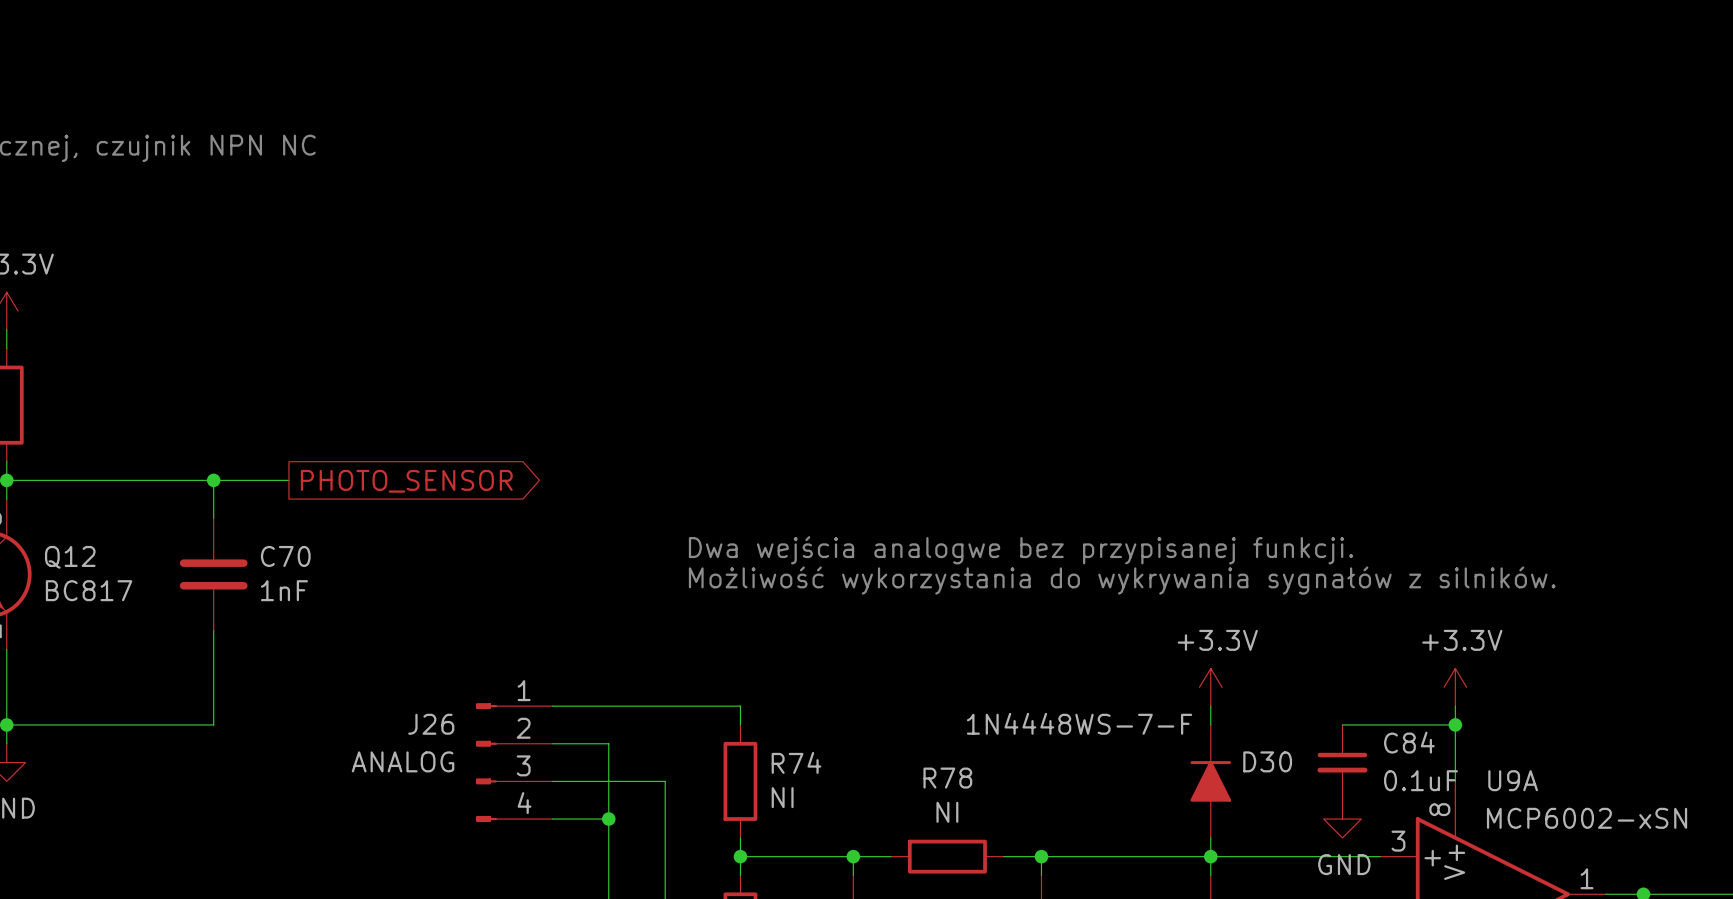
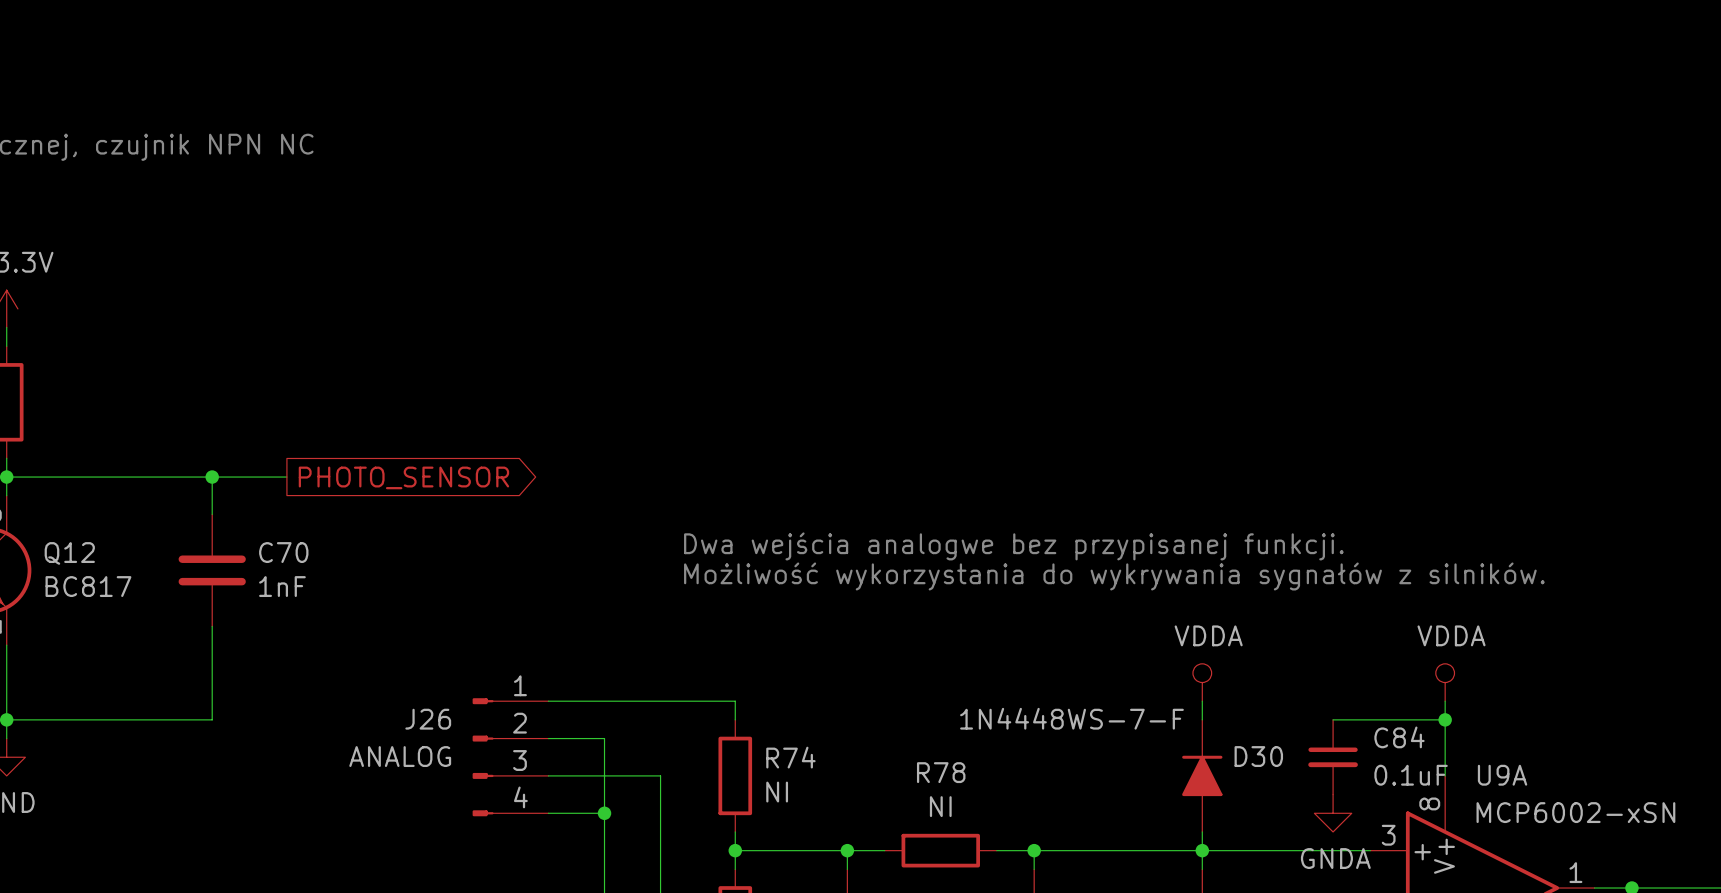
power symbol: +3.3V (1210, 687) -> VDDA (1202, 682)
power symbol: +3.3V (1455, 687) -> VDDA (1445, 682)
power symbol: GND (1342, 819) -> GNDA (1333, 813)

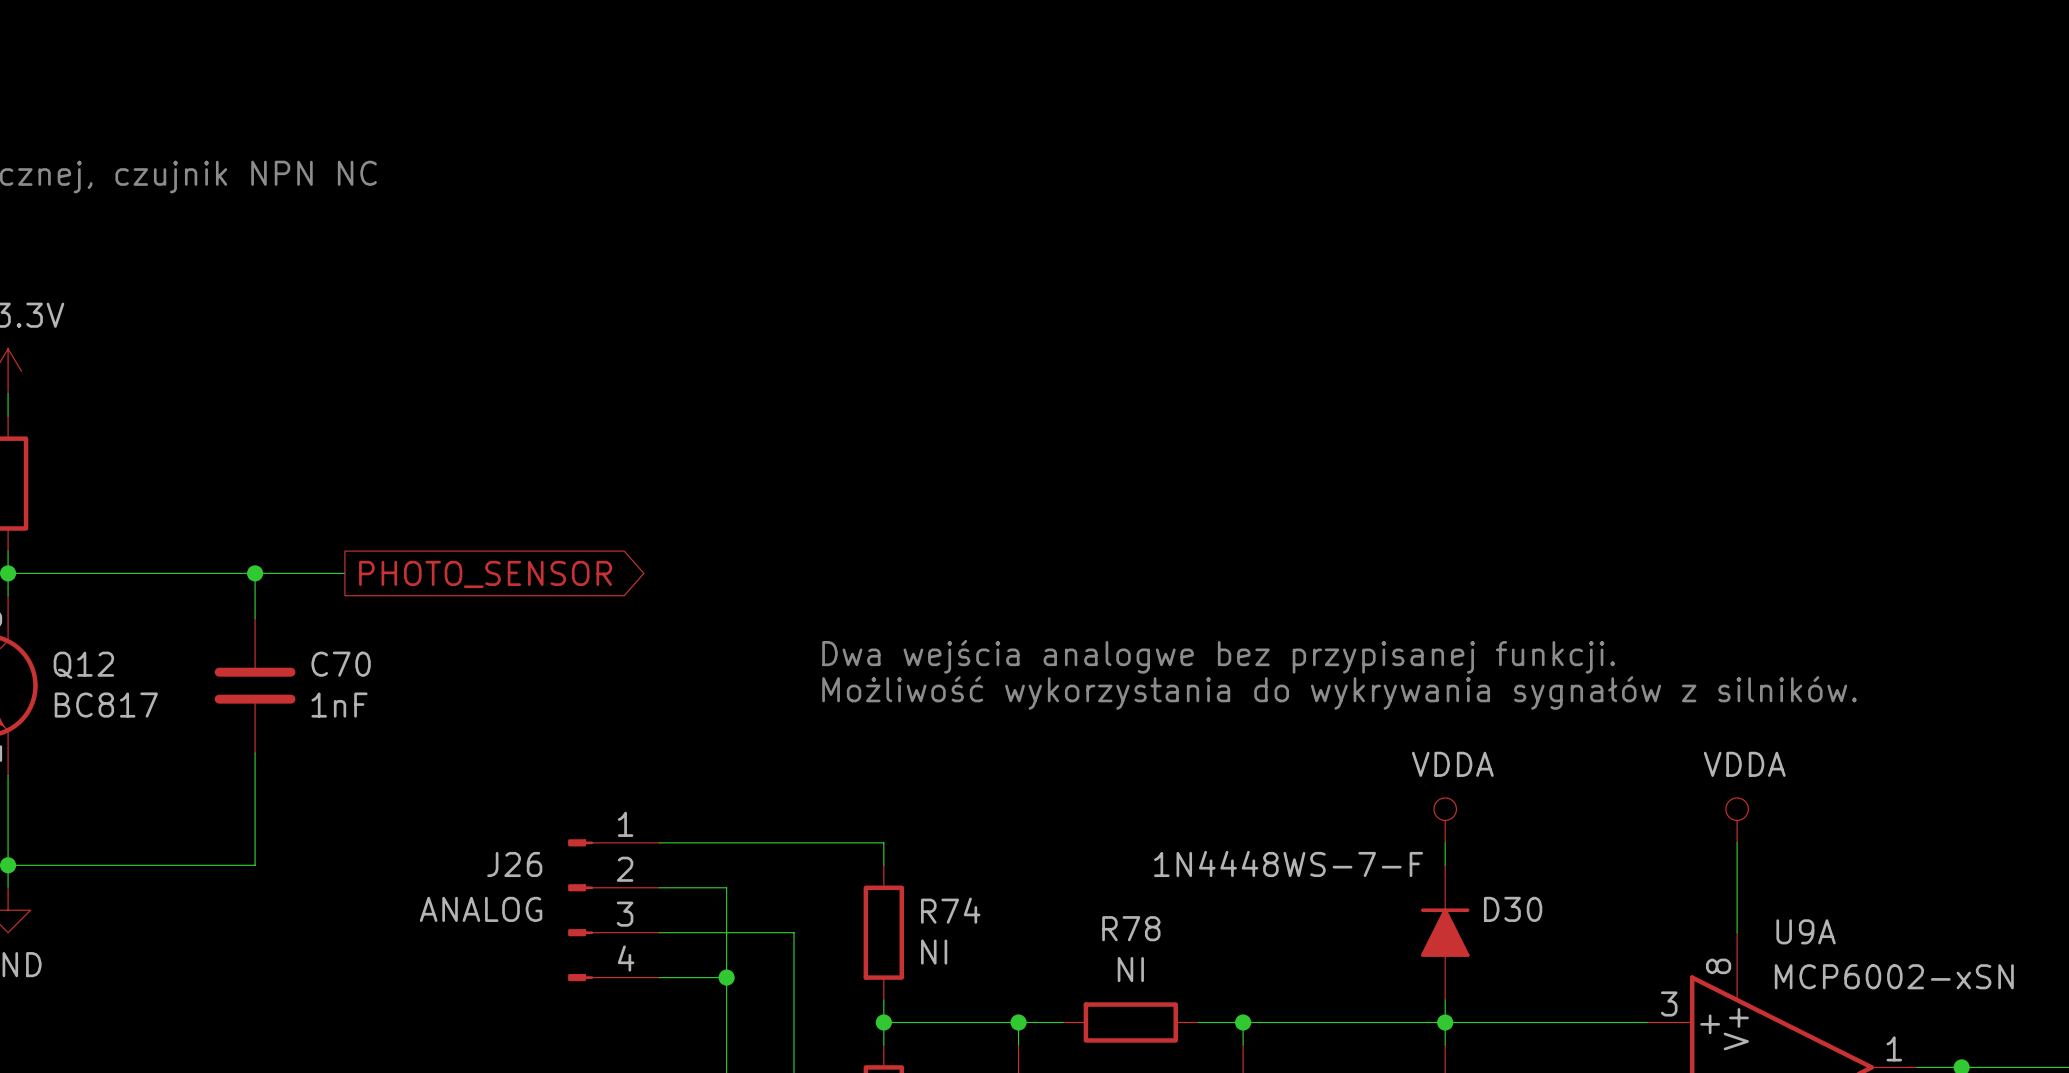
wire: (1333, 719) (1445, 719) -> none
junction: (1445, 719) -> none
C84: 0.1uF (1333, 757) -> none
power symbol: GNDA (1333, 813) -> none

